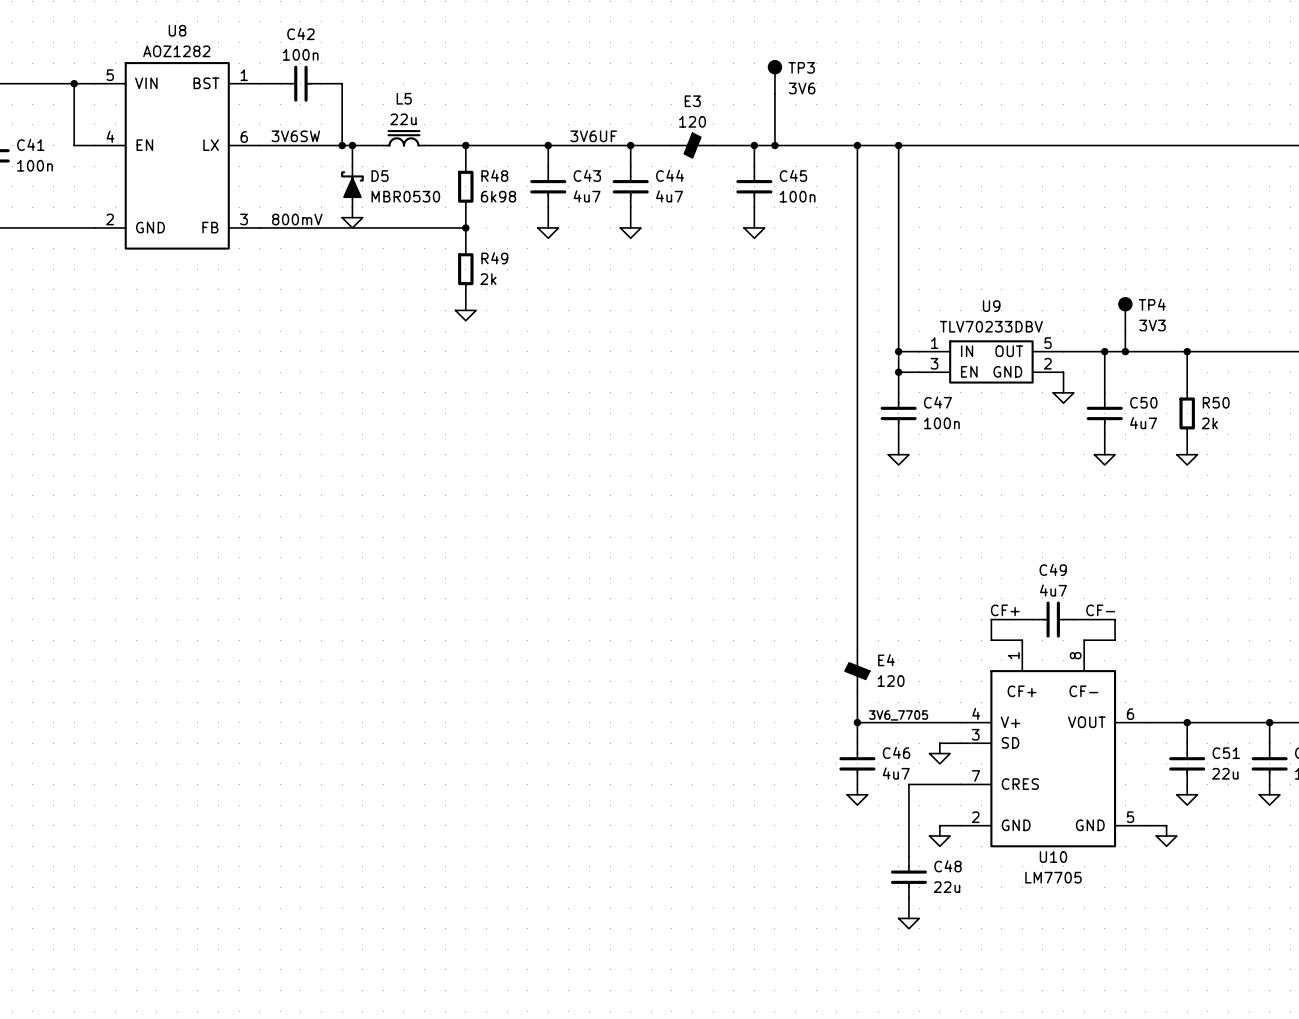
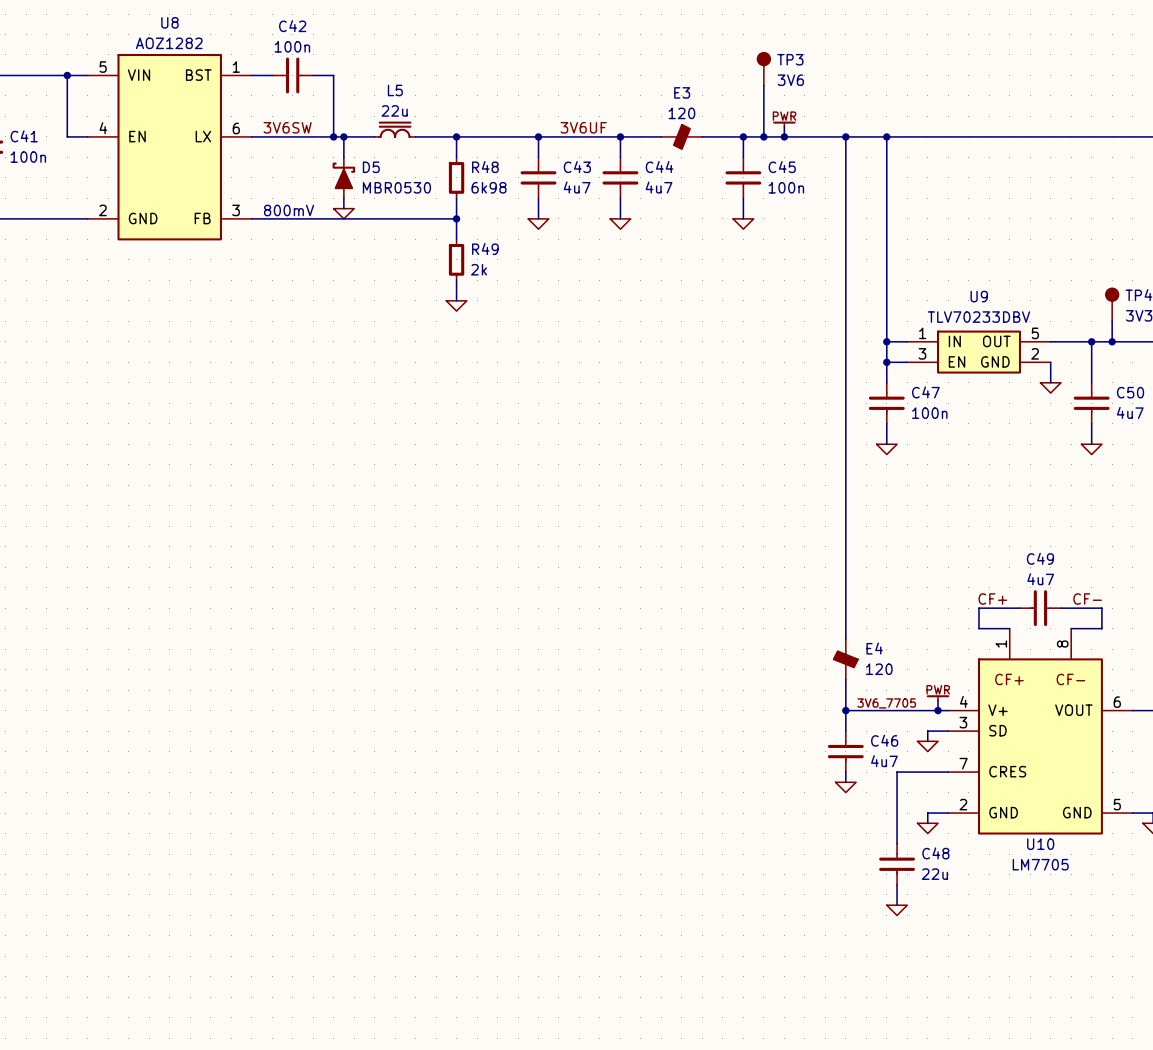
power symbol: none -> (784, 124)
wire: none -> (784, 126) (784, 136)
junction: none -> (784, 136)
power symbol: none -> (938, 697)
wire: none -> (938, 700) (938, 710)
junction: none -> (938, 710)

